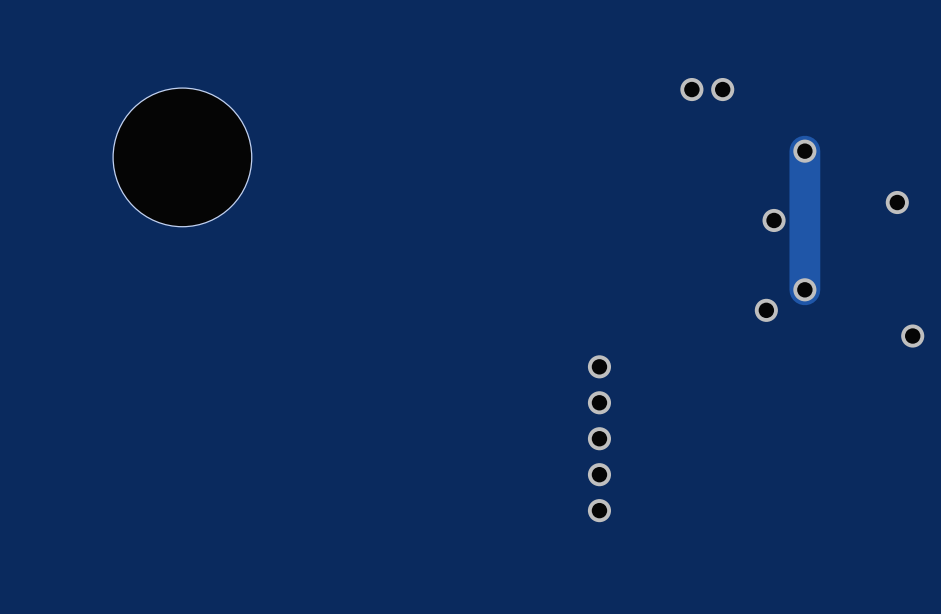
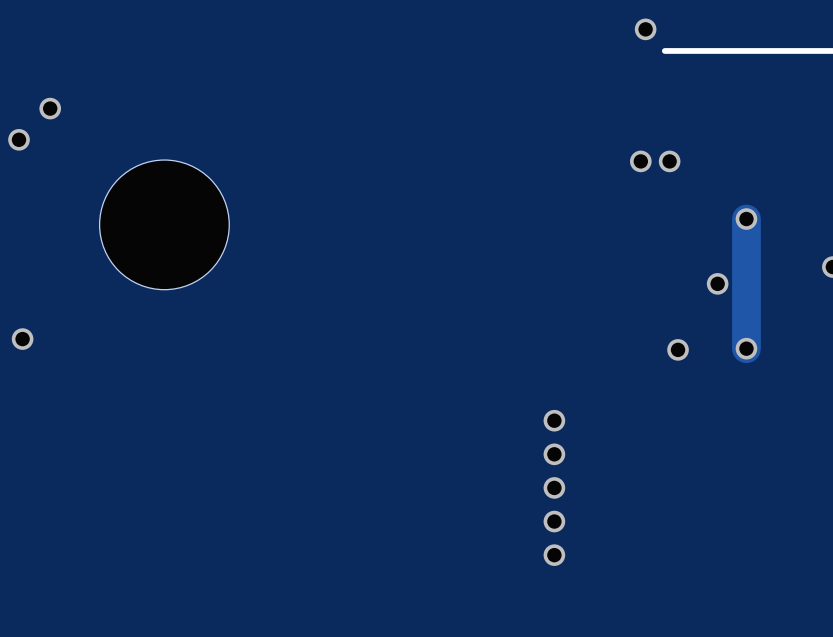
via: none -> (50, 108)
via: none -> (19, 139)
via: none -> (22, 339)
via position: (766, 310) -> (678, 349)

